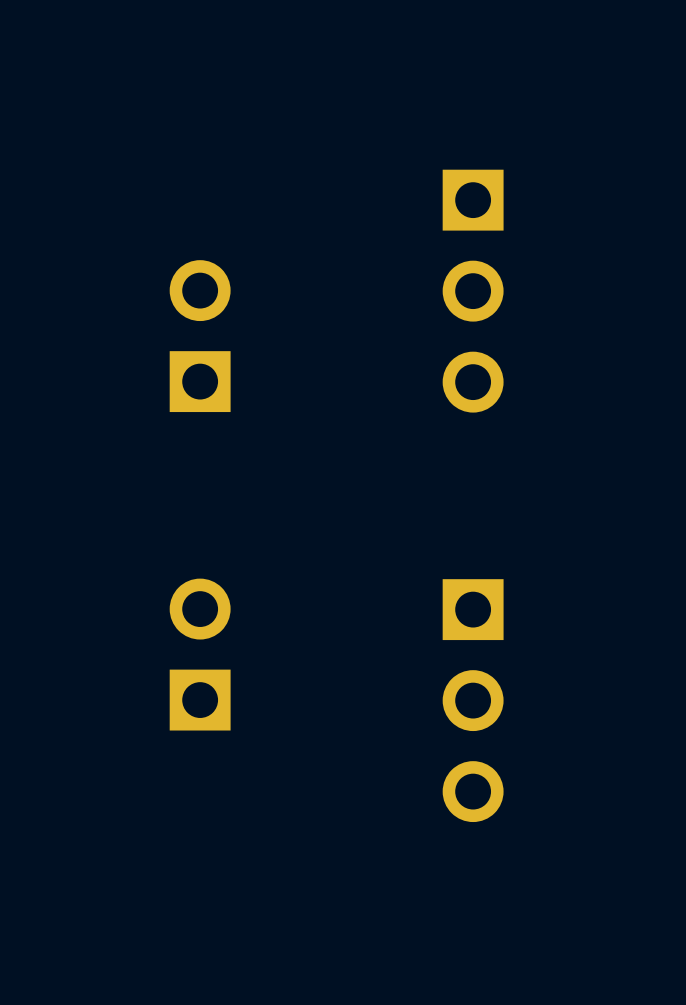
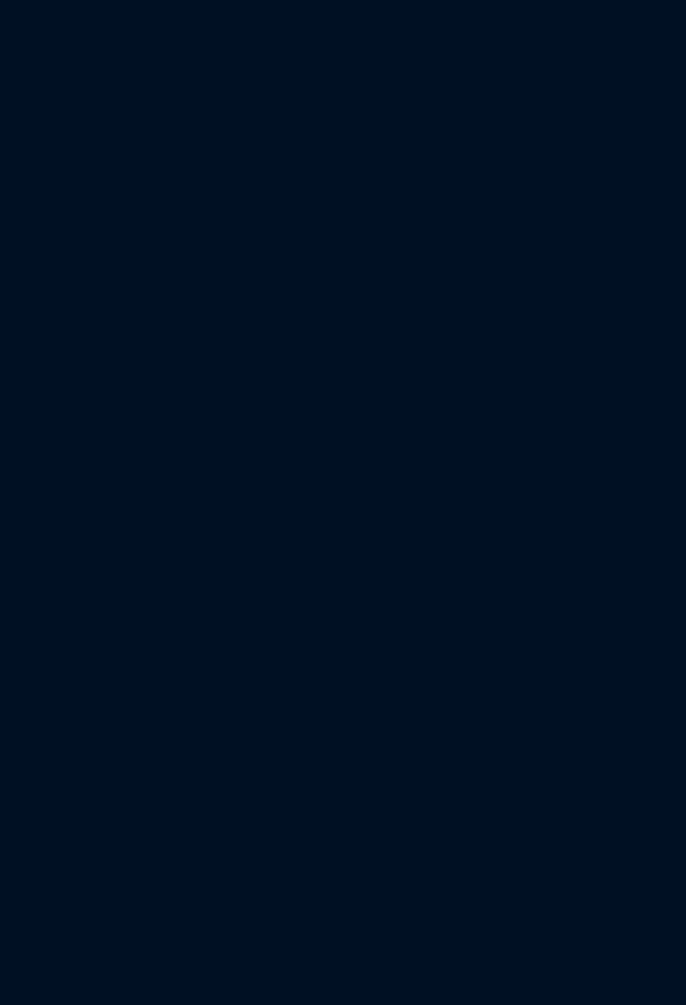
part: (473, 291) -> none
part: (200, 336) -> none
part: (200, 654) -> none
part: (473, 700) -> none

